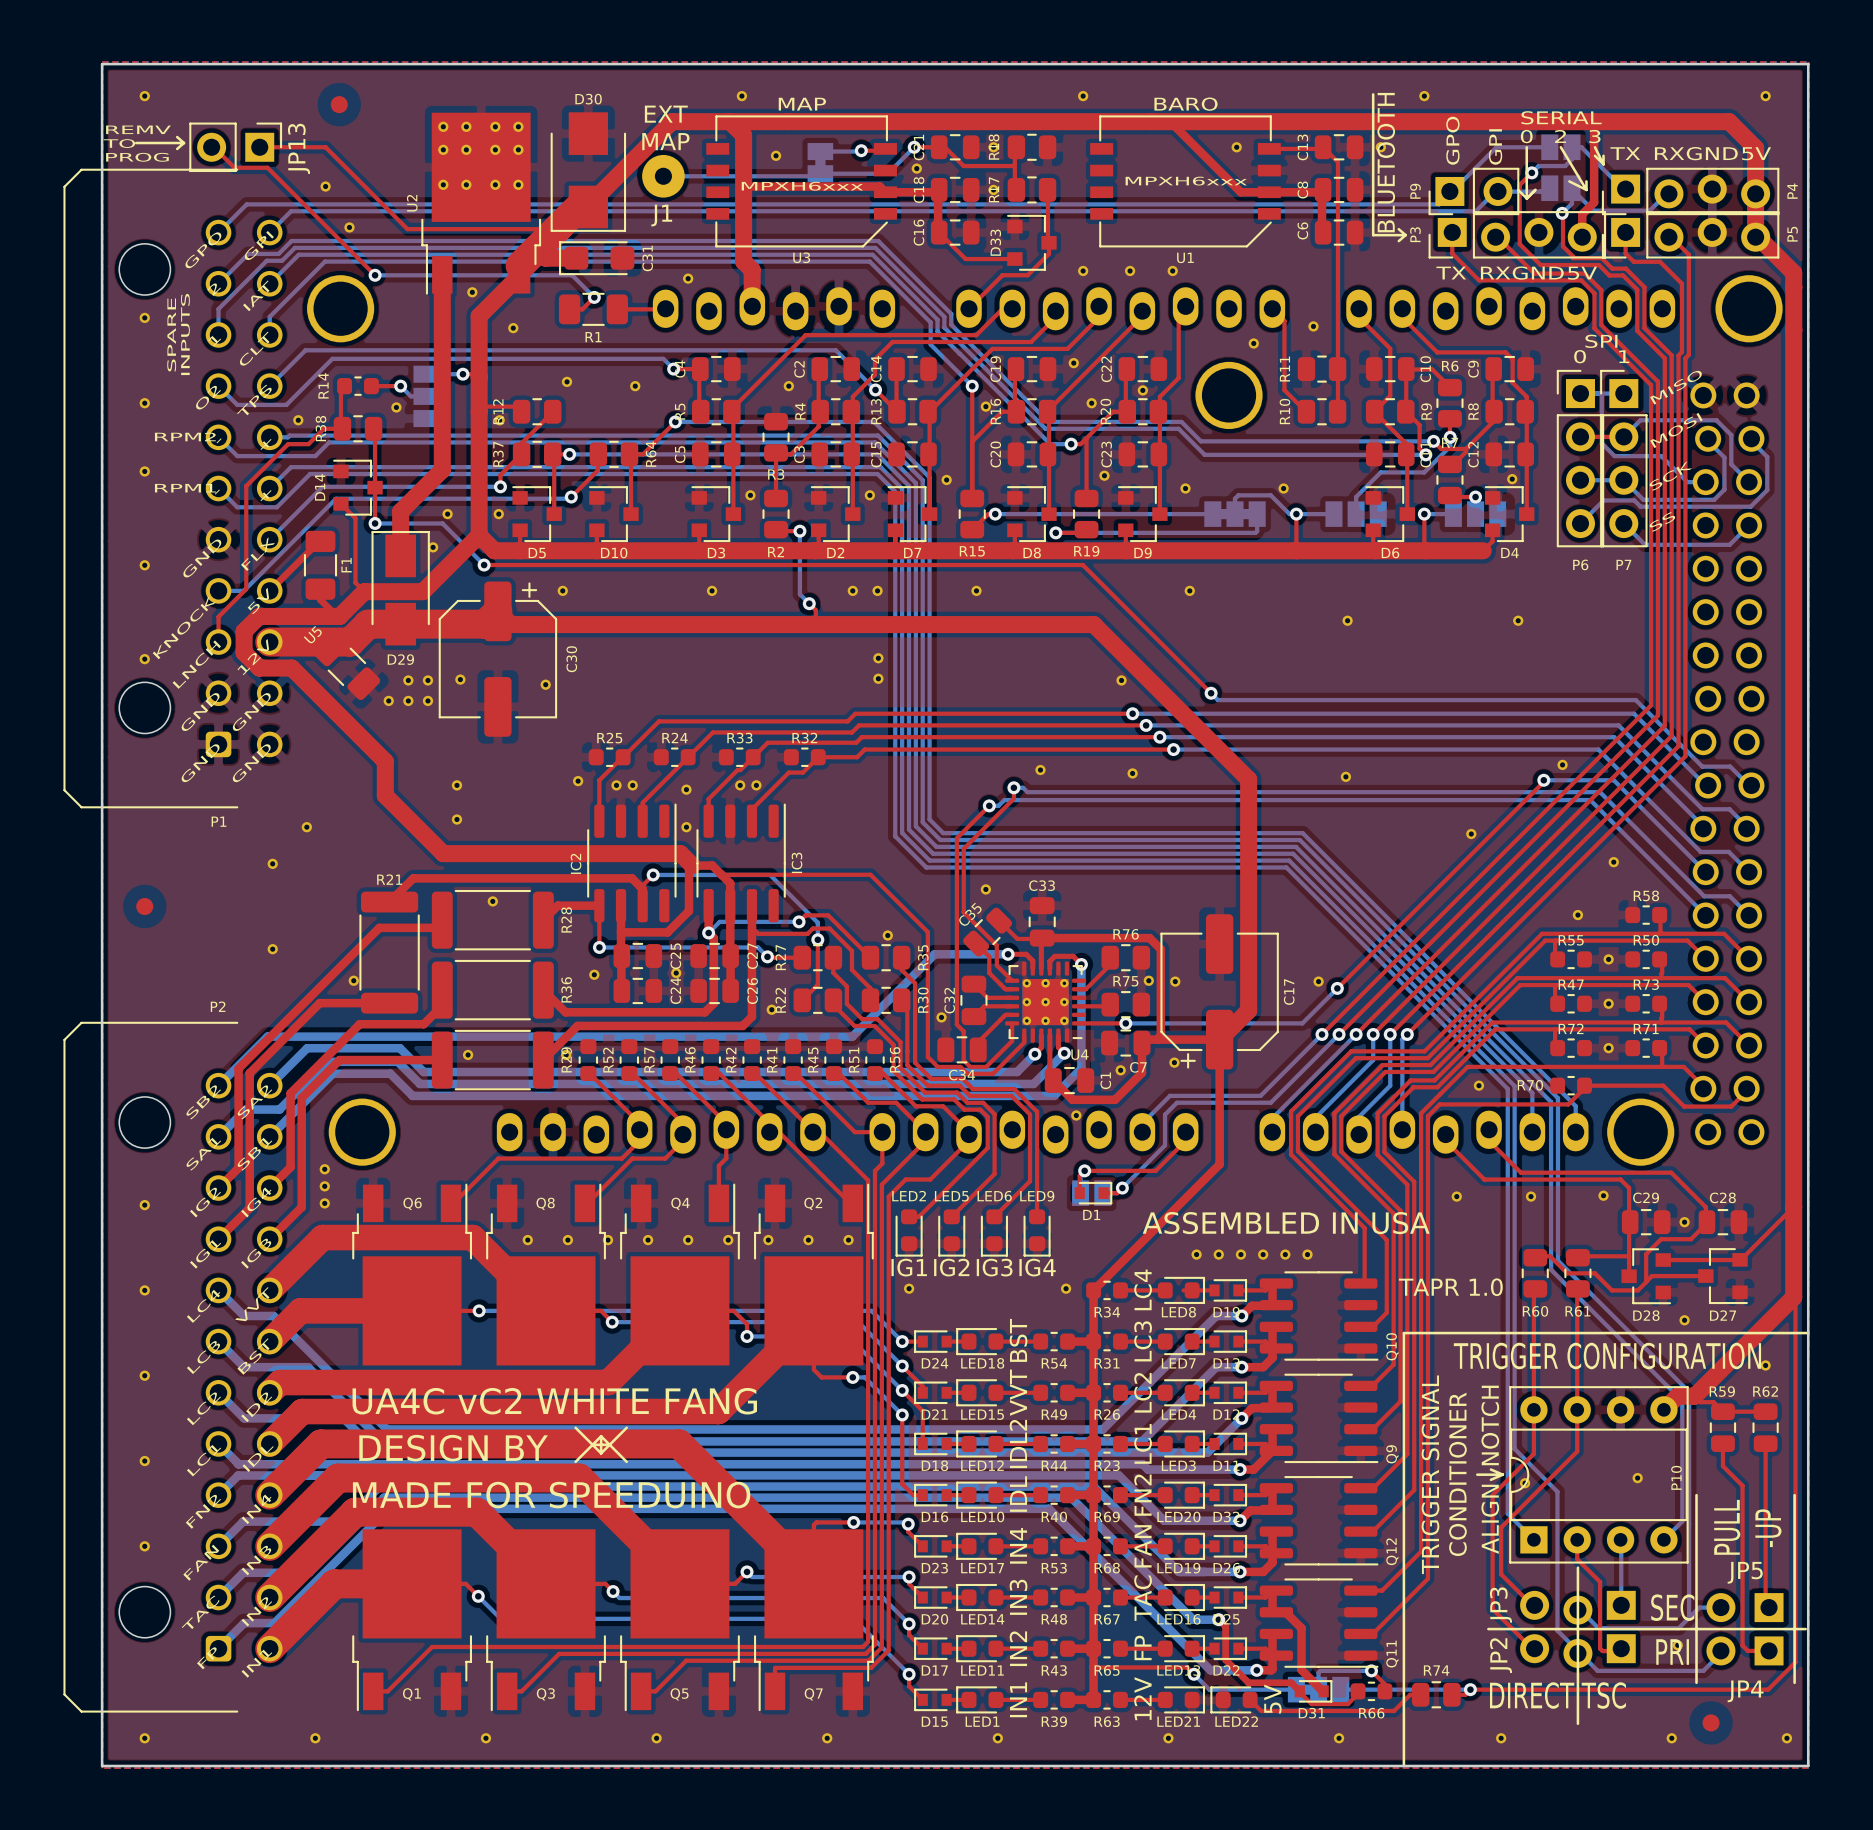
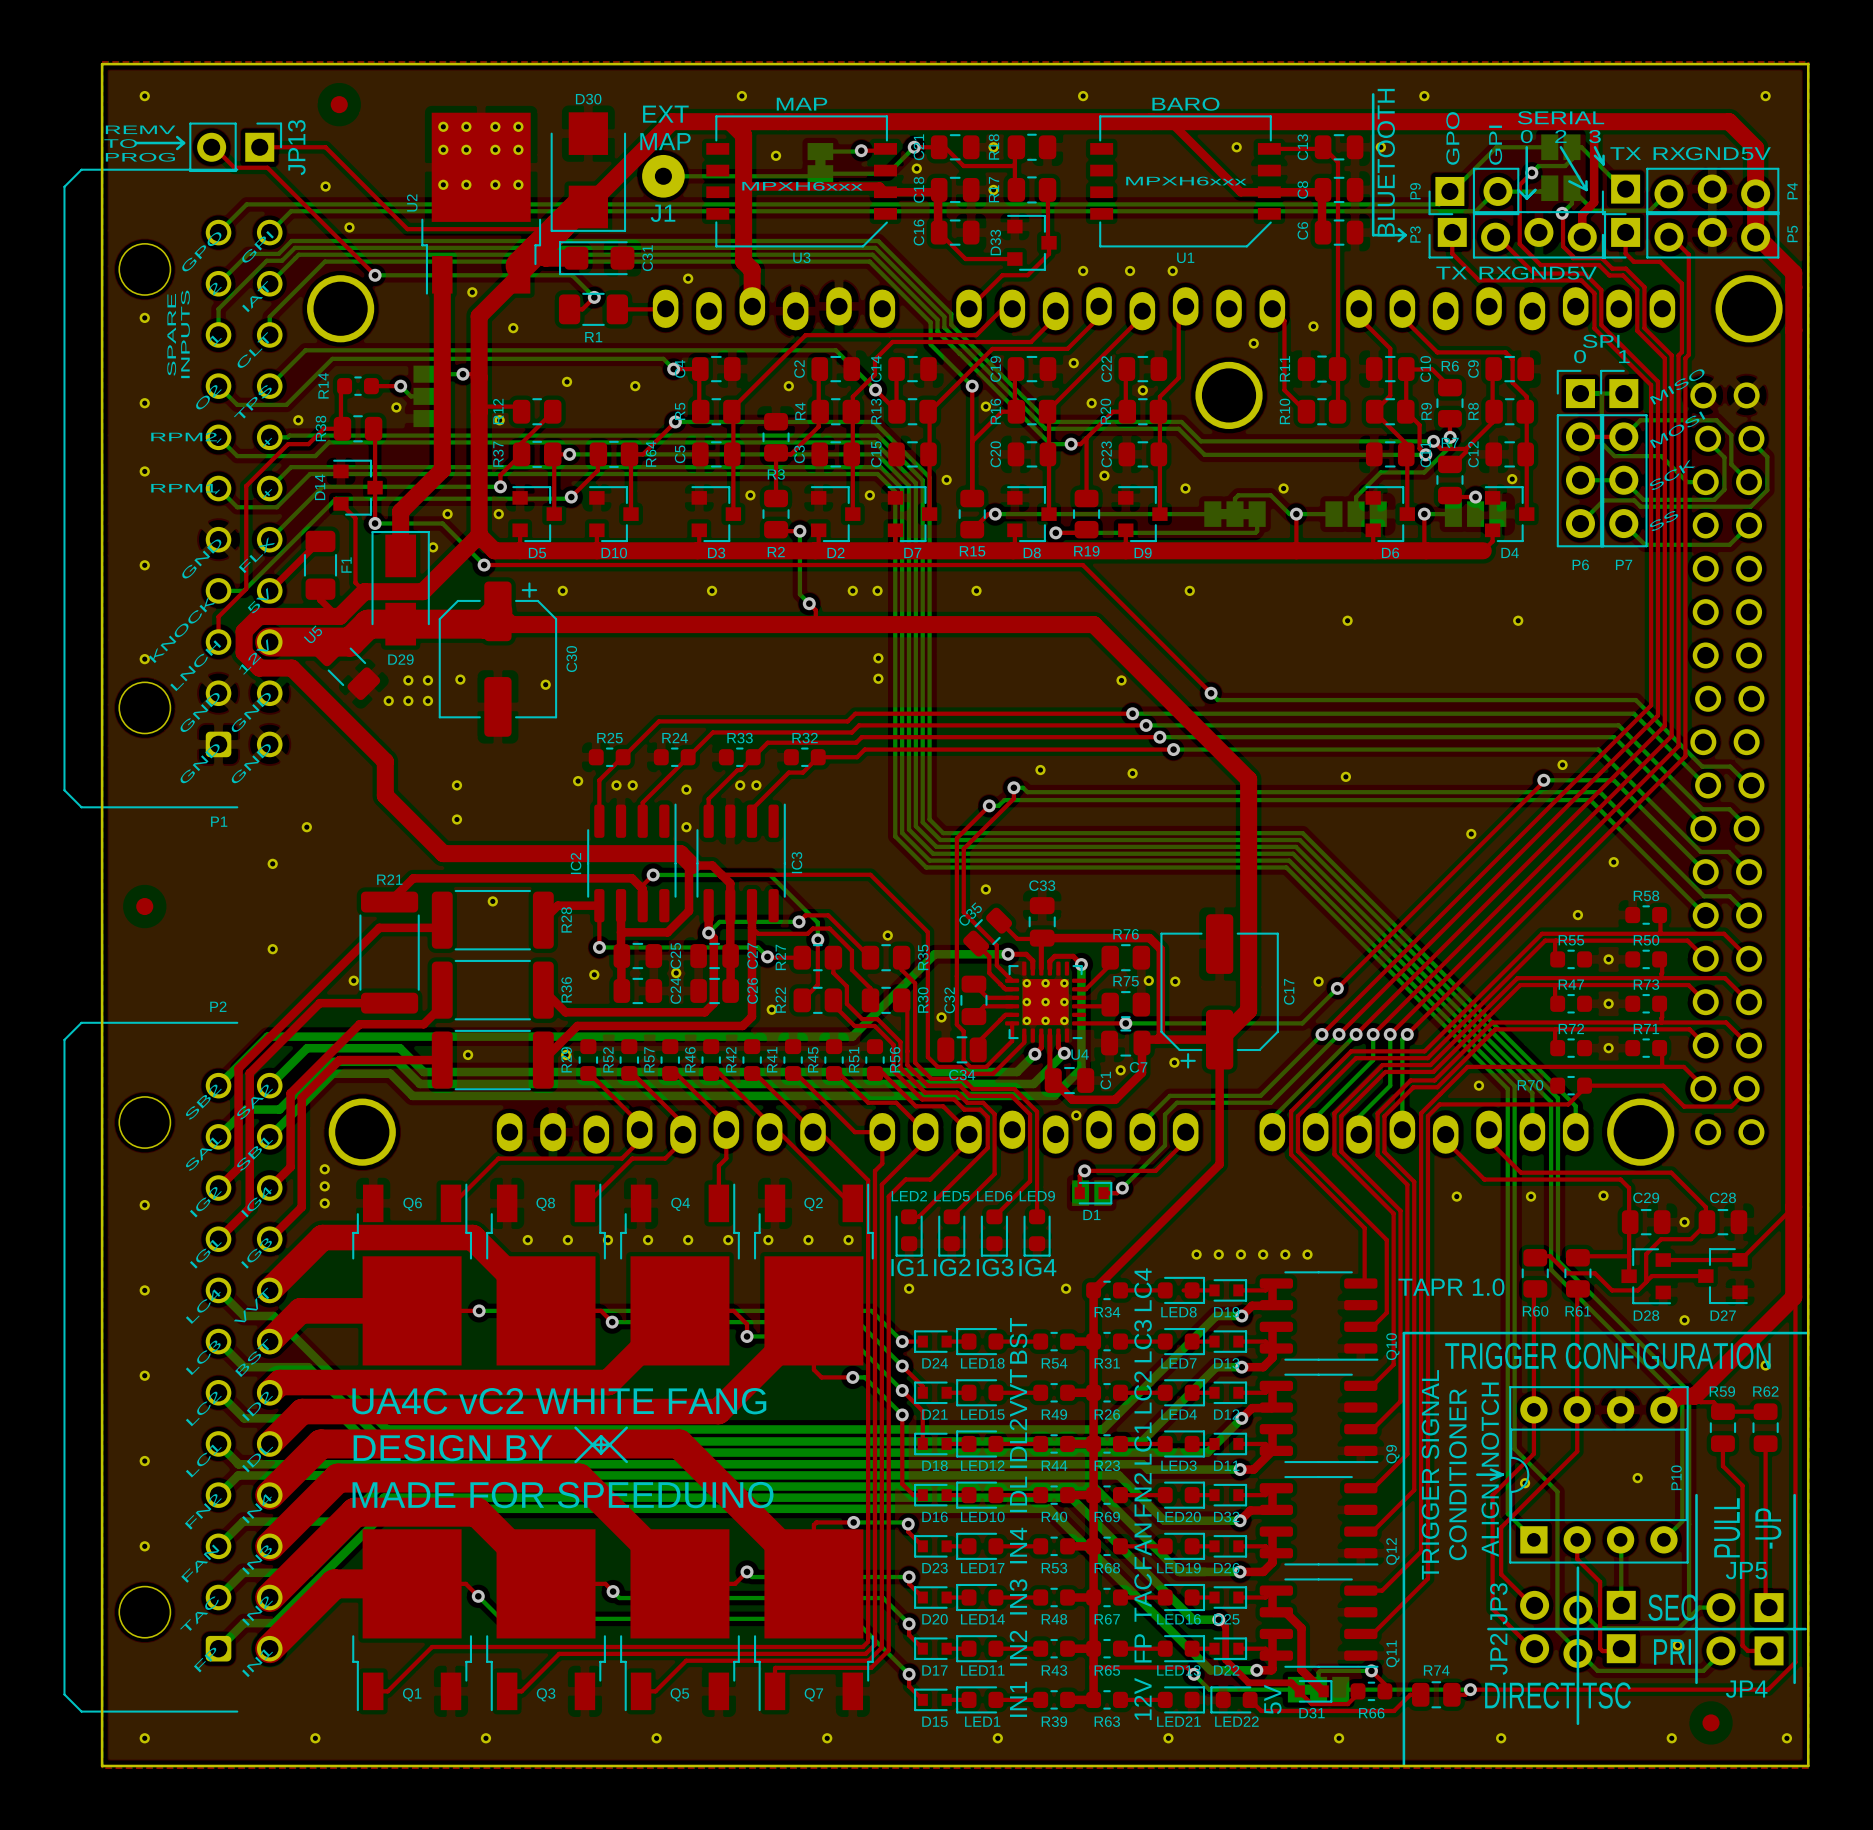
text: ASSEMBLED IN USA (1286, 1223) -> none

